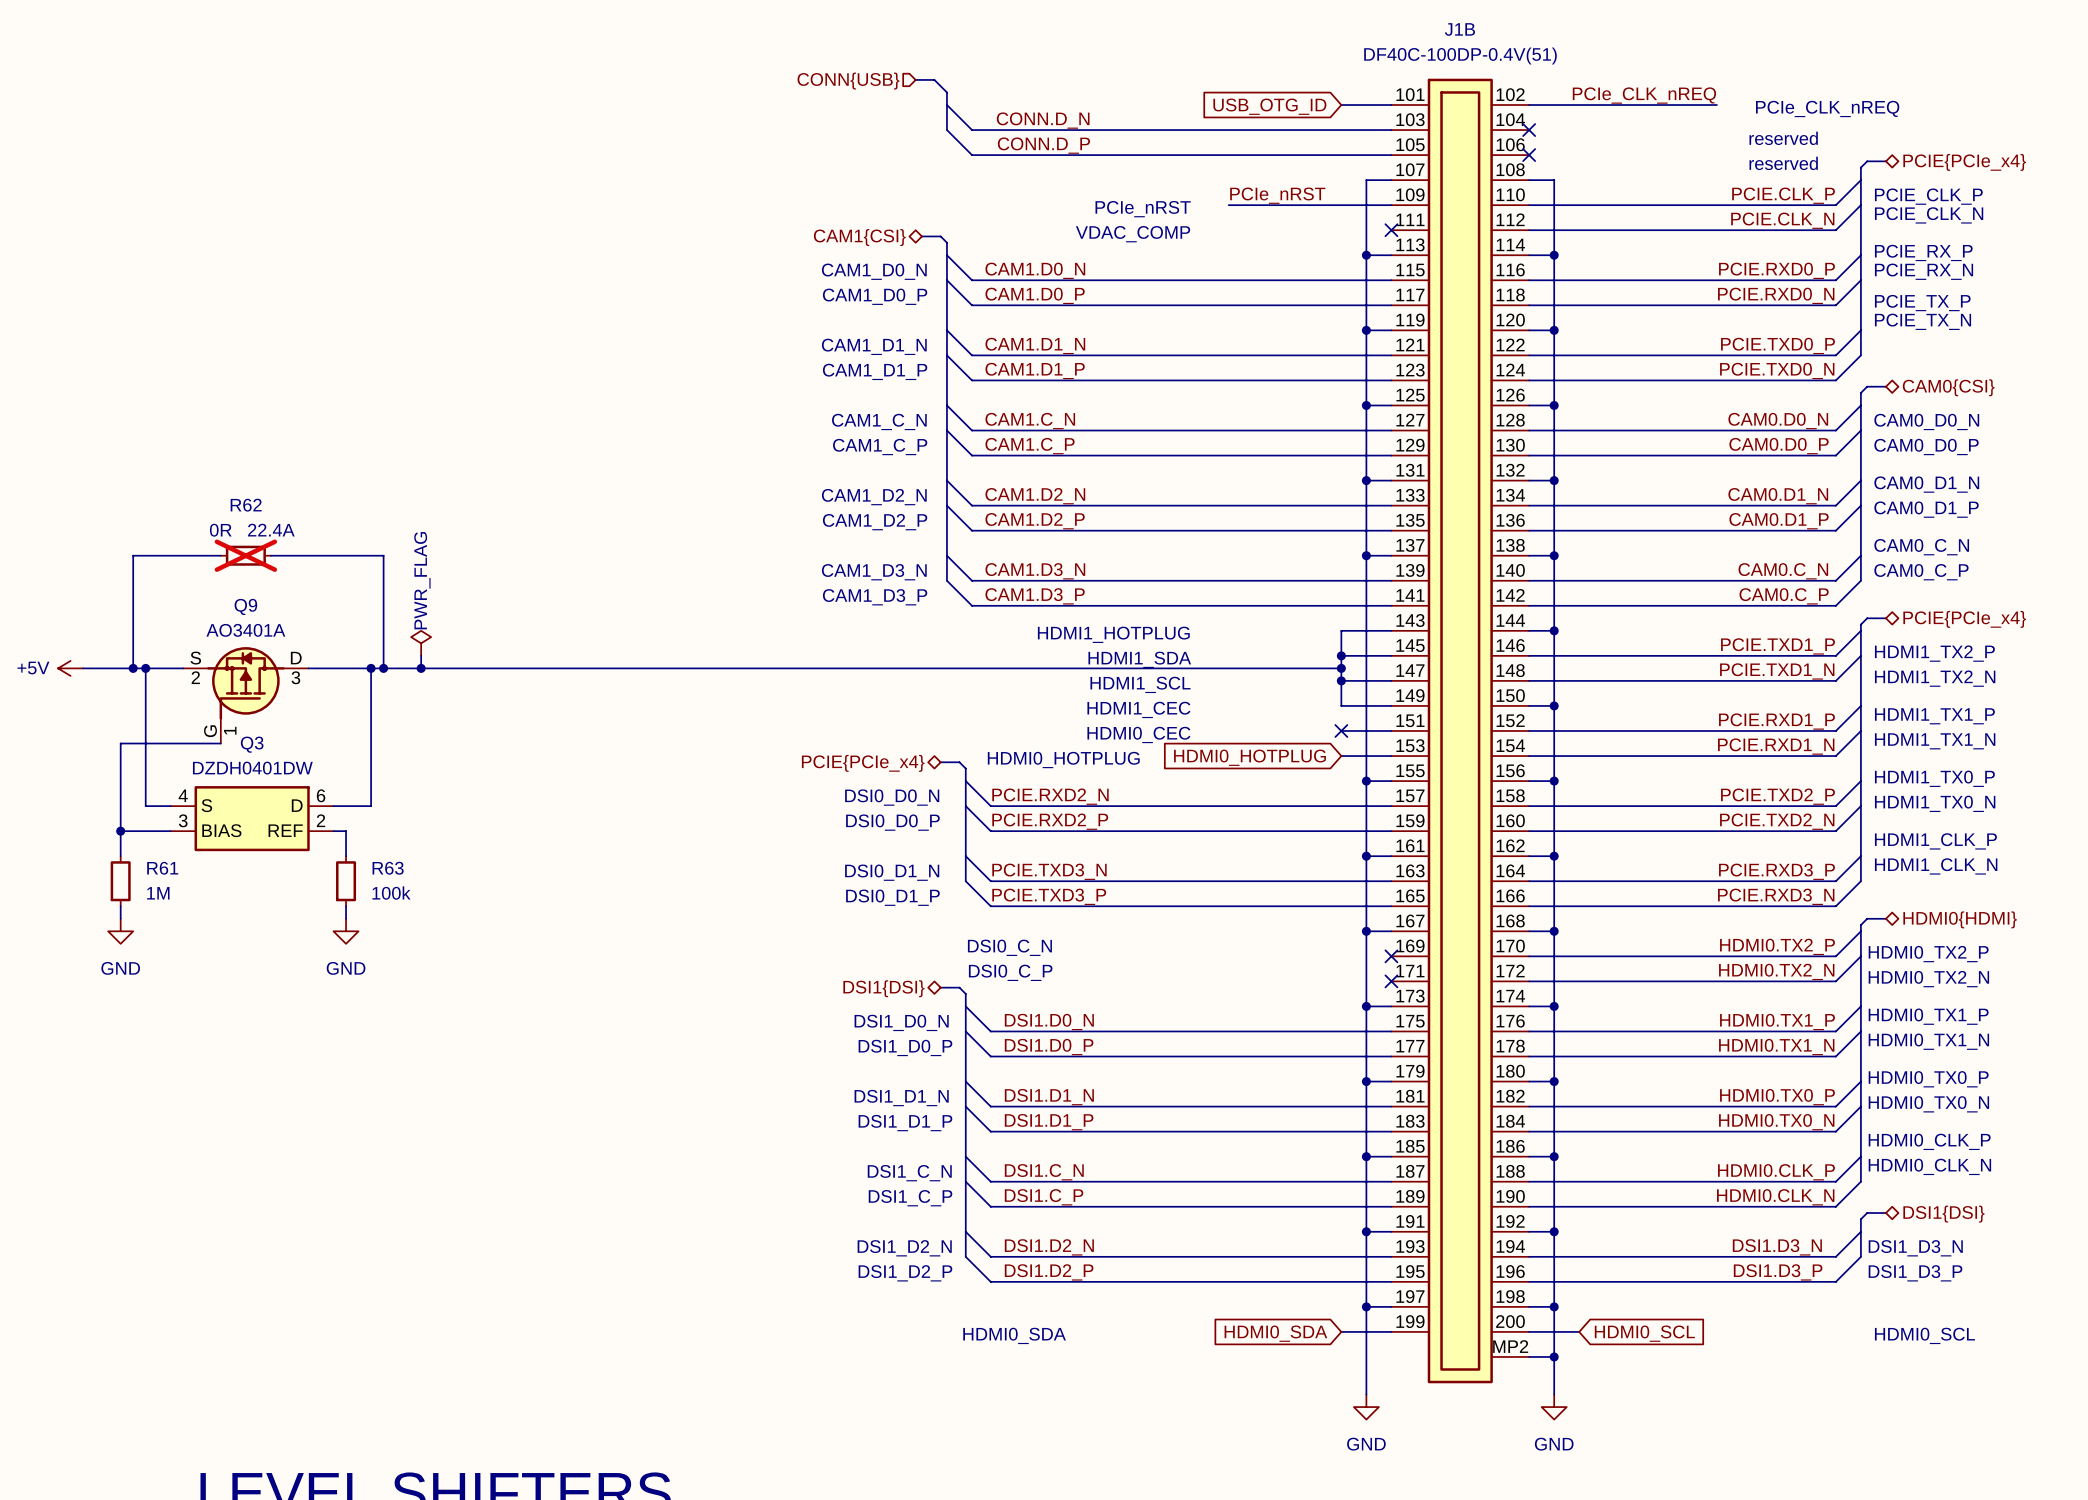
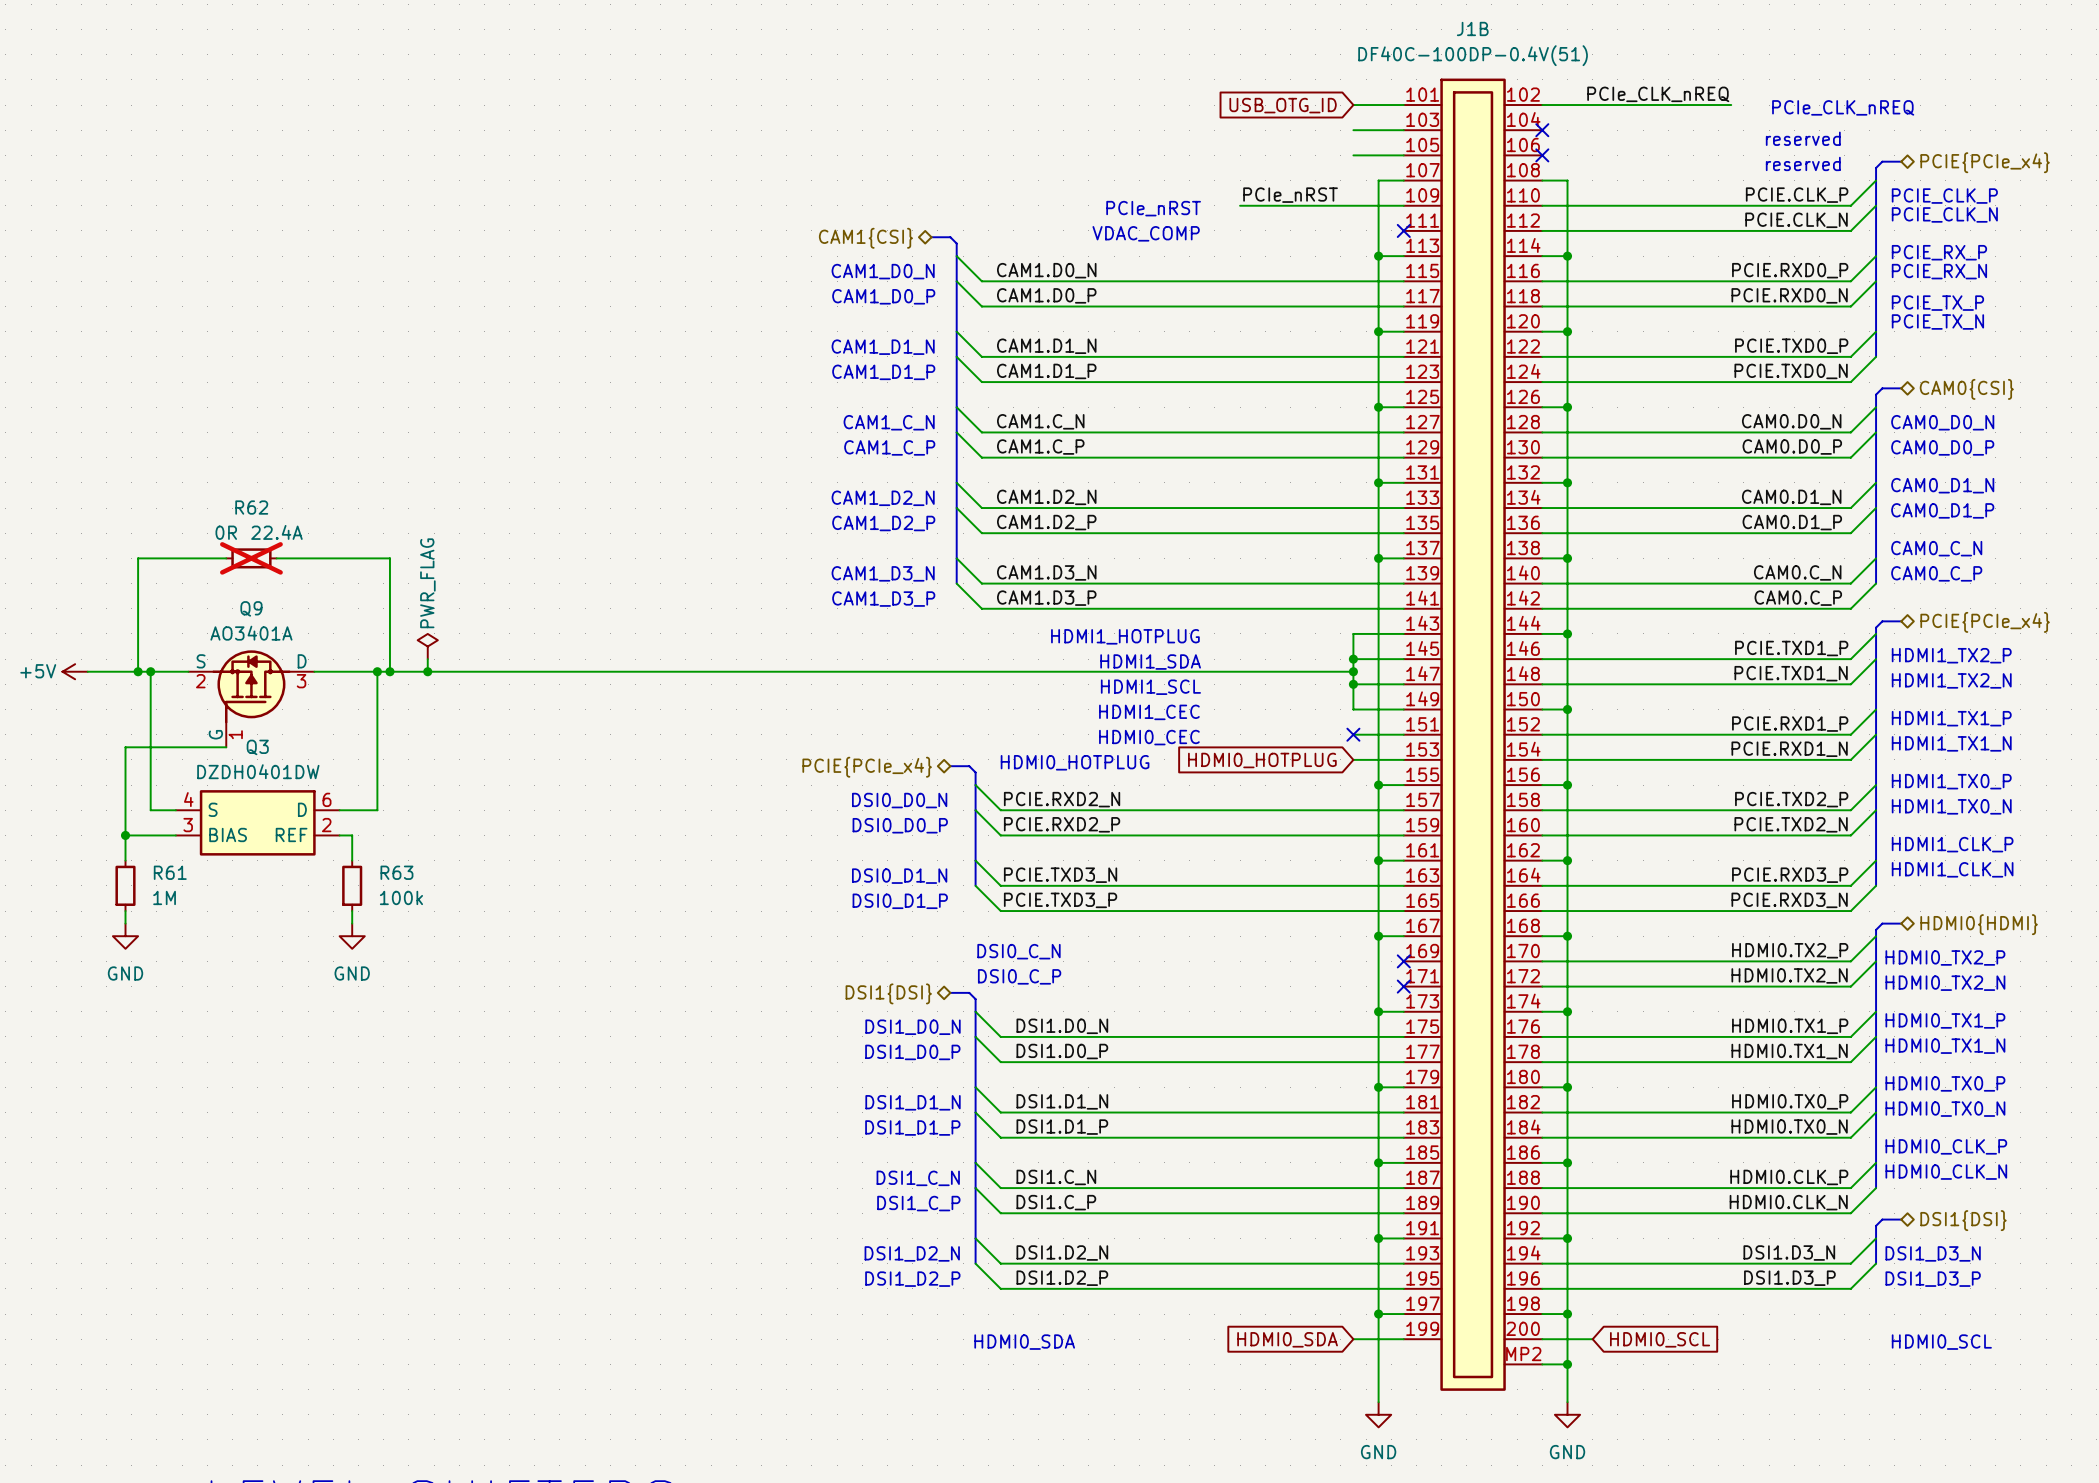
bus: (915, 79) (934, 79) (946, 92) (946, 130) -> none
hierarchical label: CONN{USB} (848, 81) -> none
wire: (946, 105) (972, 130) -> none
label: CONN.D_N (1043, 120) -> none
wire: (946, 130) (972, 155) -> none
wire: (972, 130) (1341, 130) -> none
label: CONN.D_P (1043, 145) -> none
wire: (972, 155) (1341, 155) -> none

